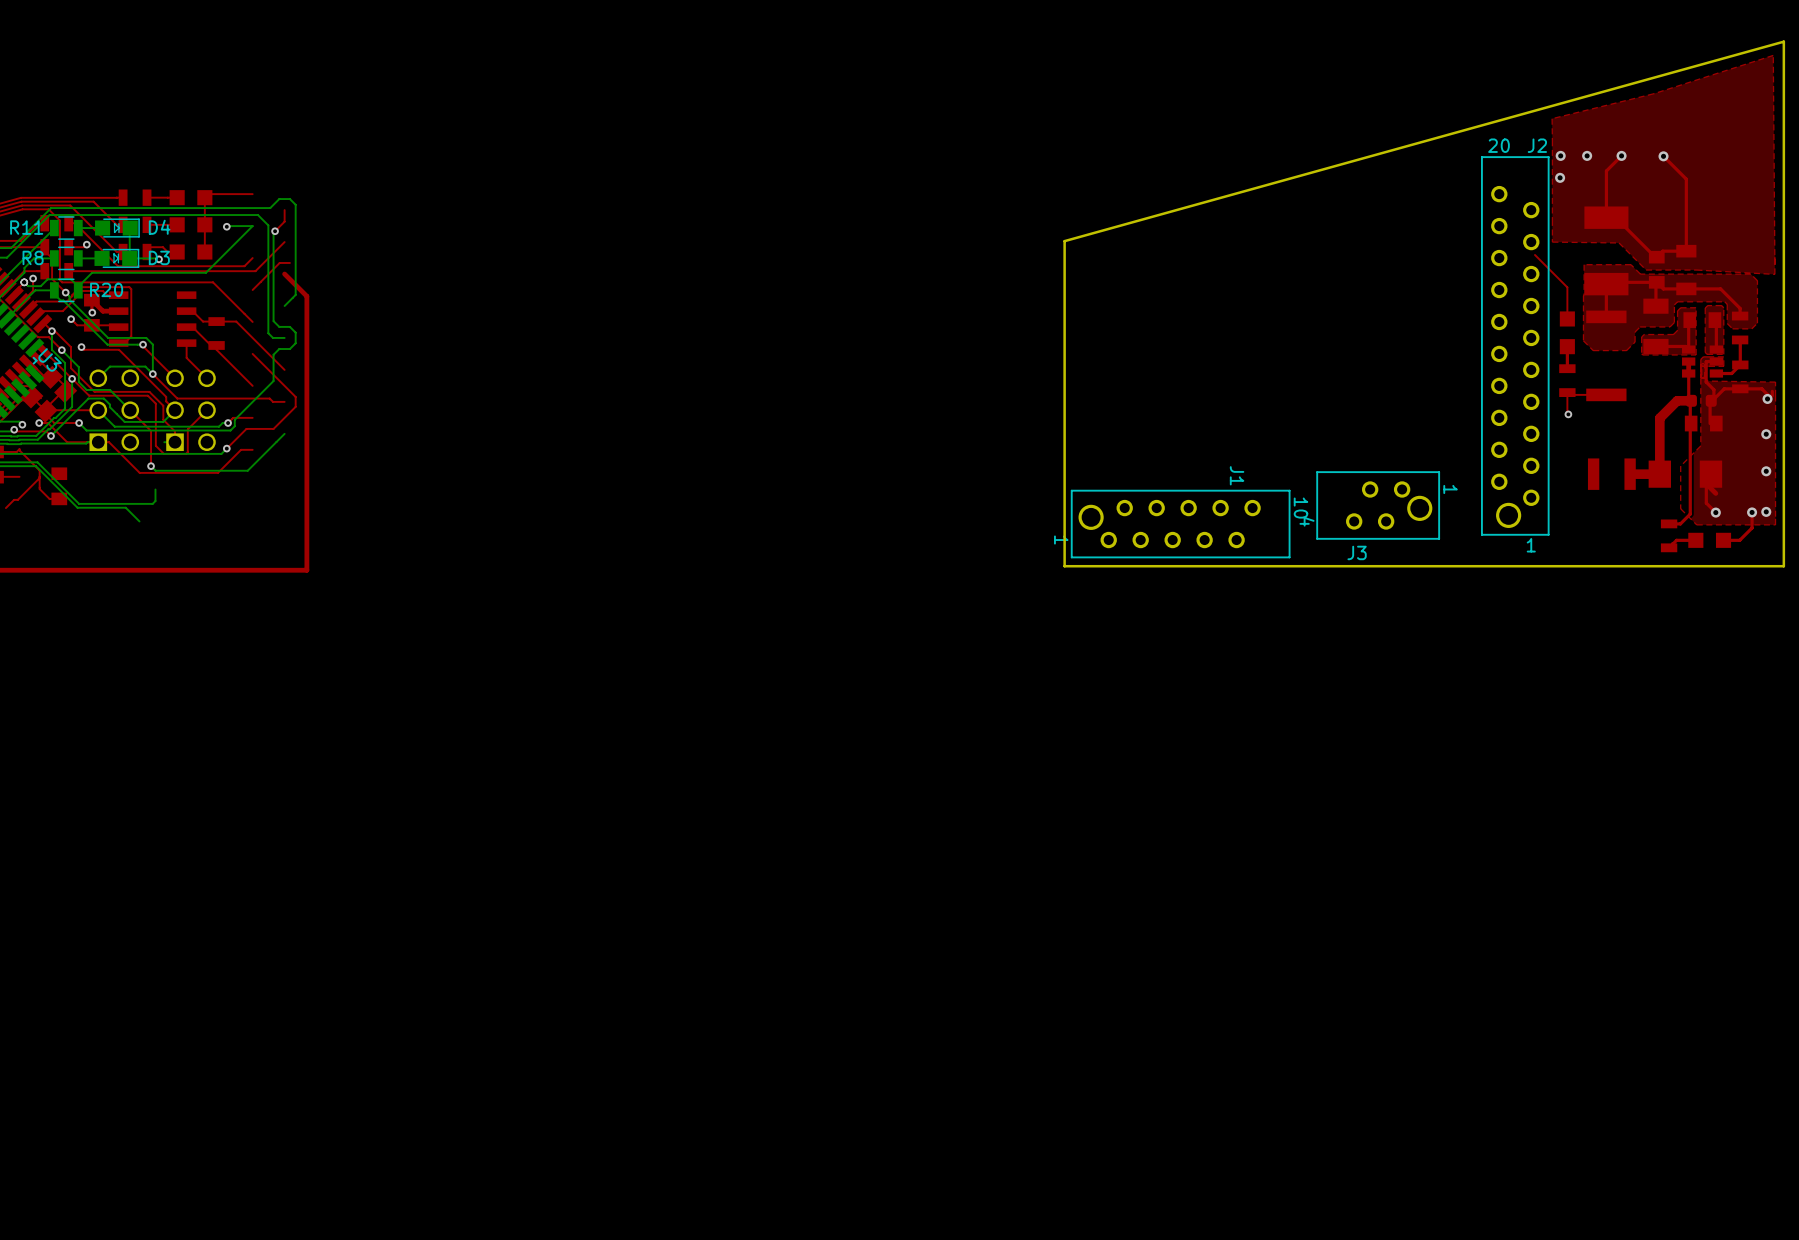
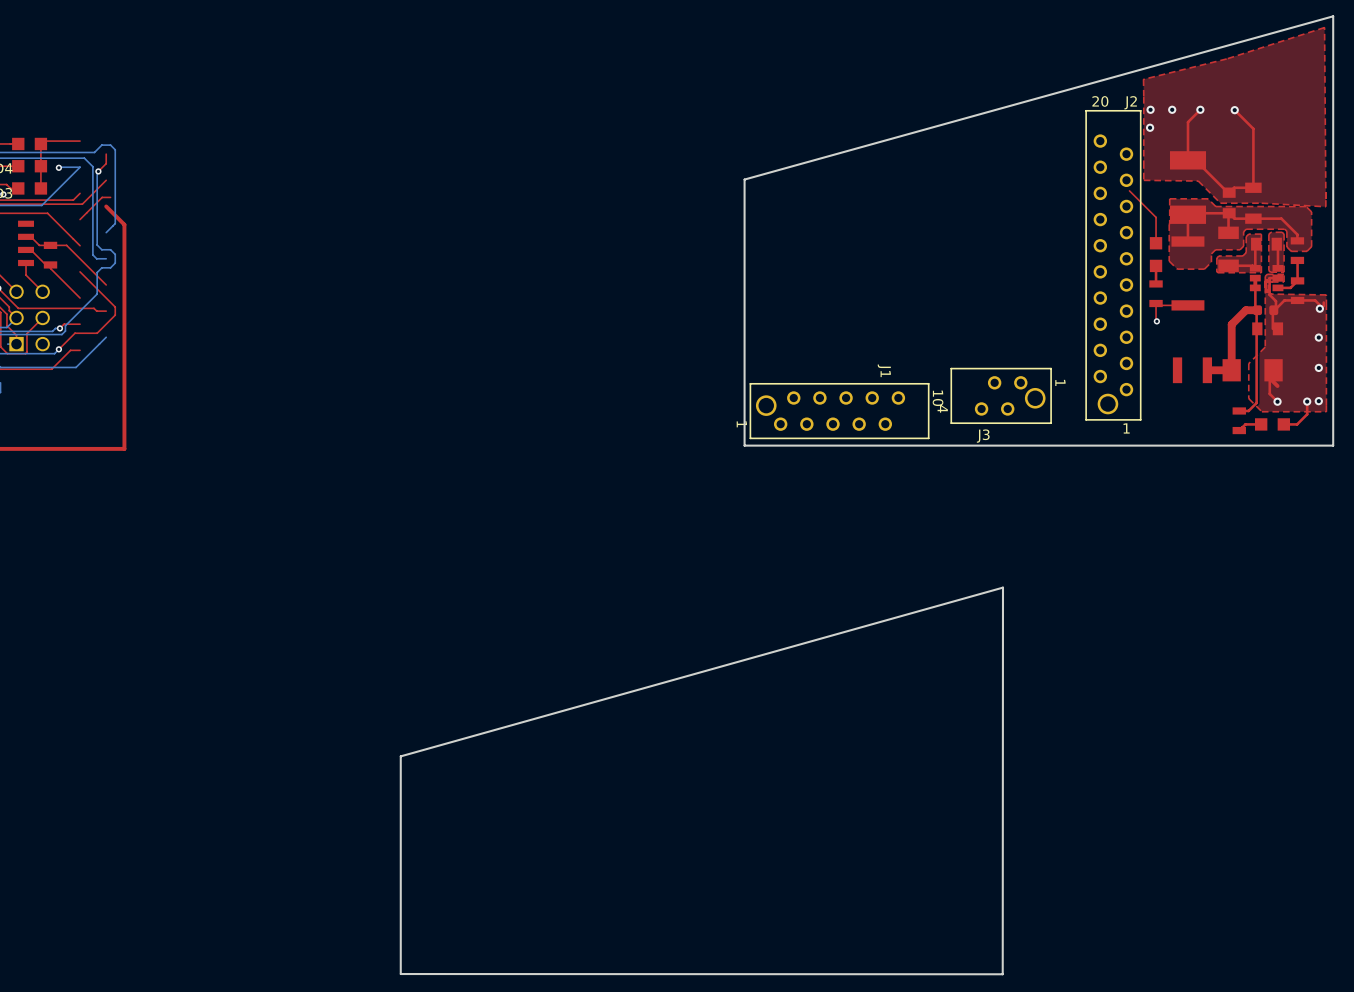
board edge: none -> (1002, 587) (1002, 974) (400, 974) (400, 756) (1002, 587)

